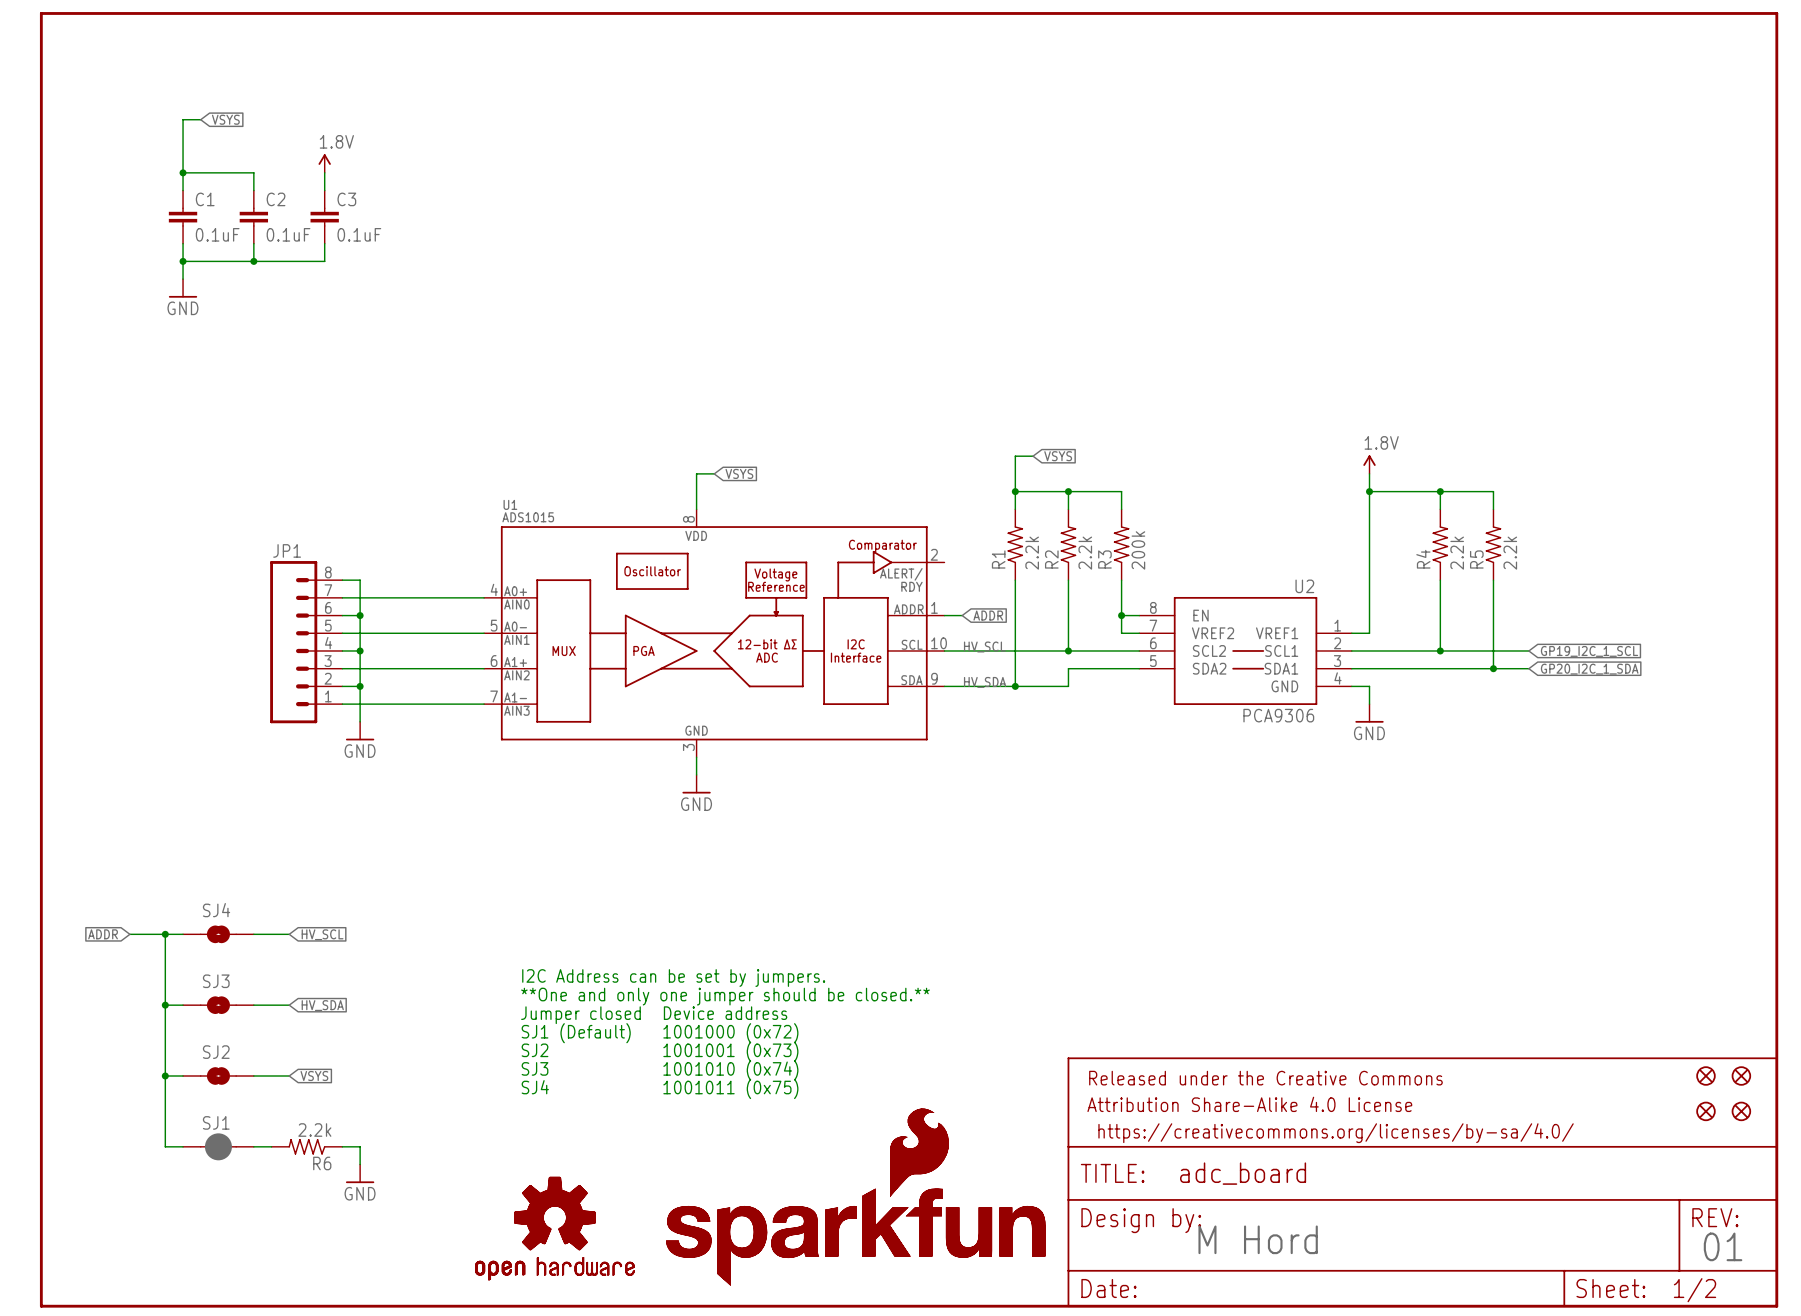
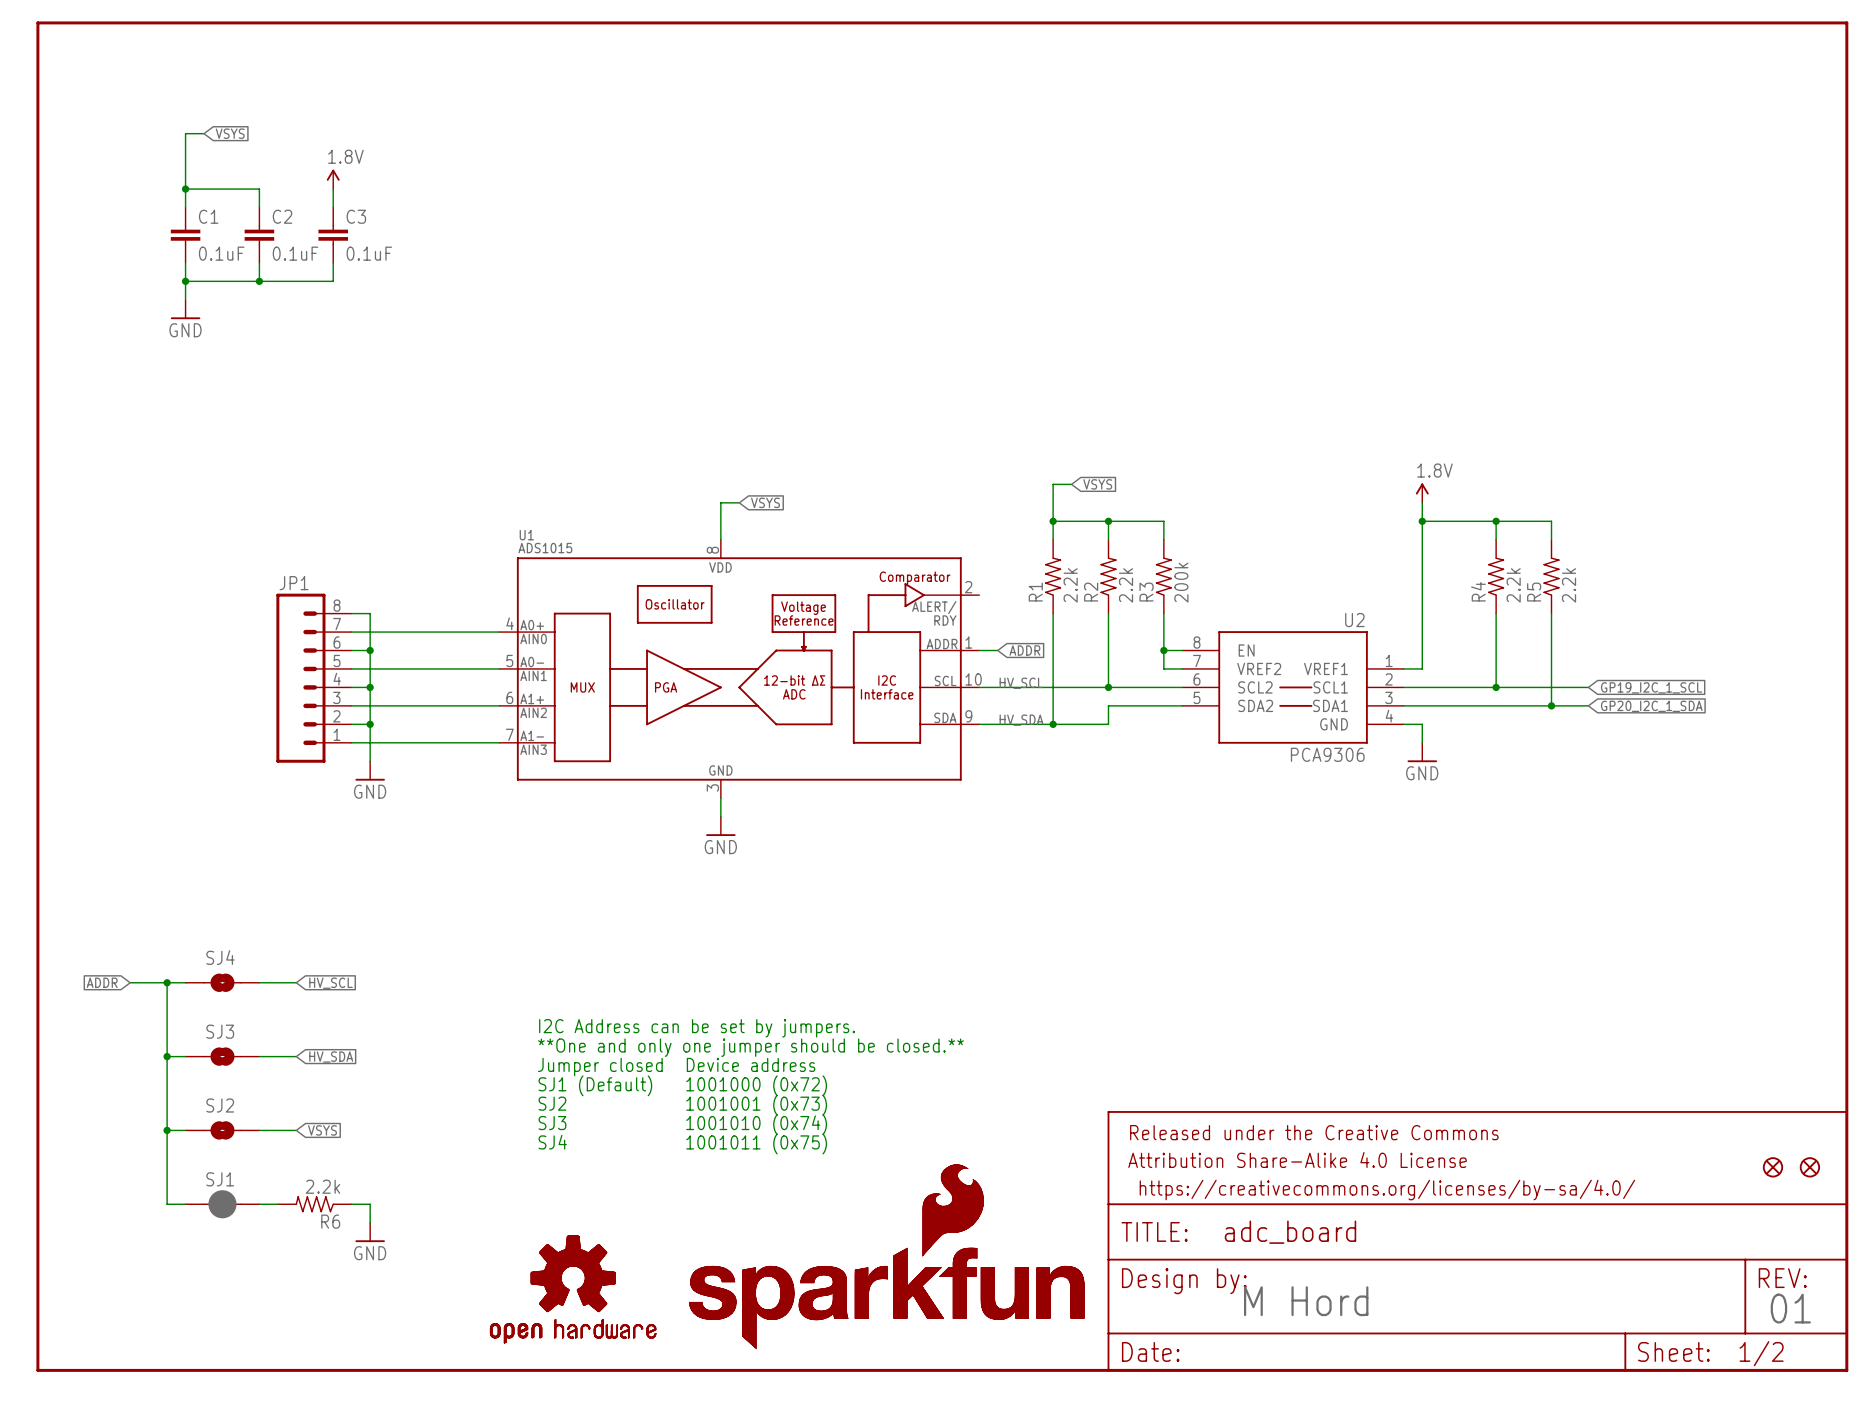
part: (1705, 1076) -> none
part: (1741, 1076) -> none

